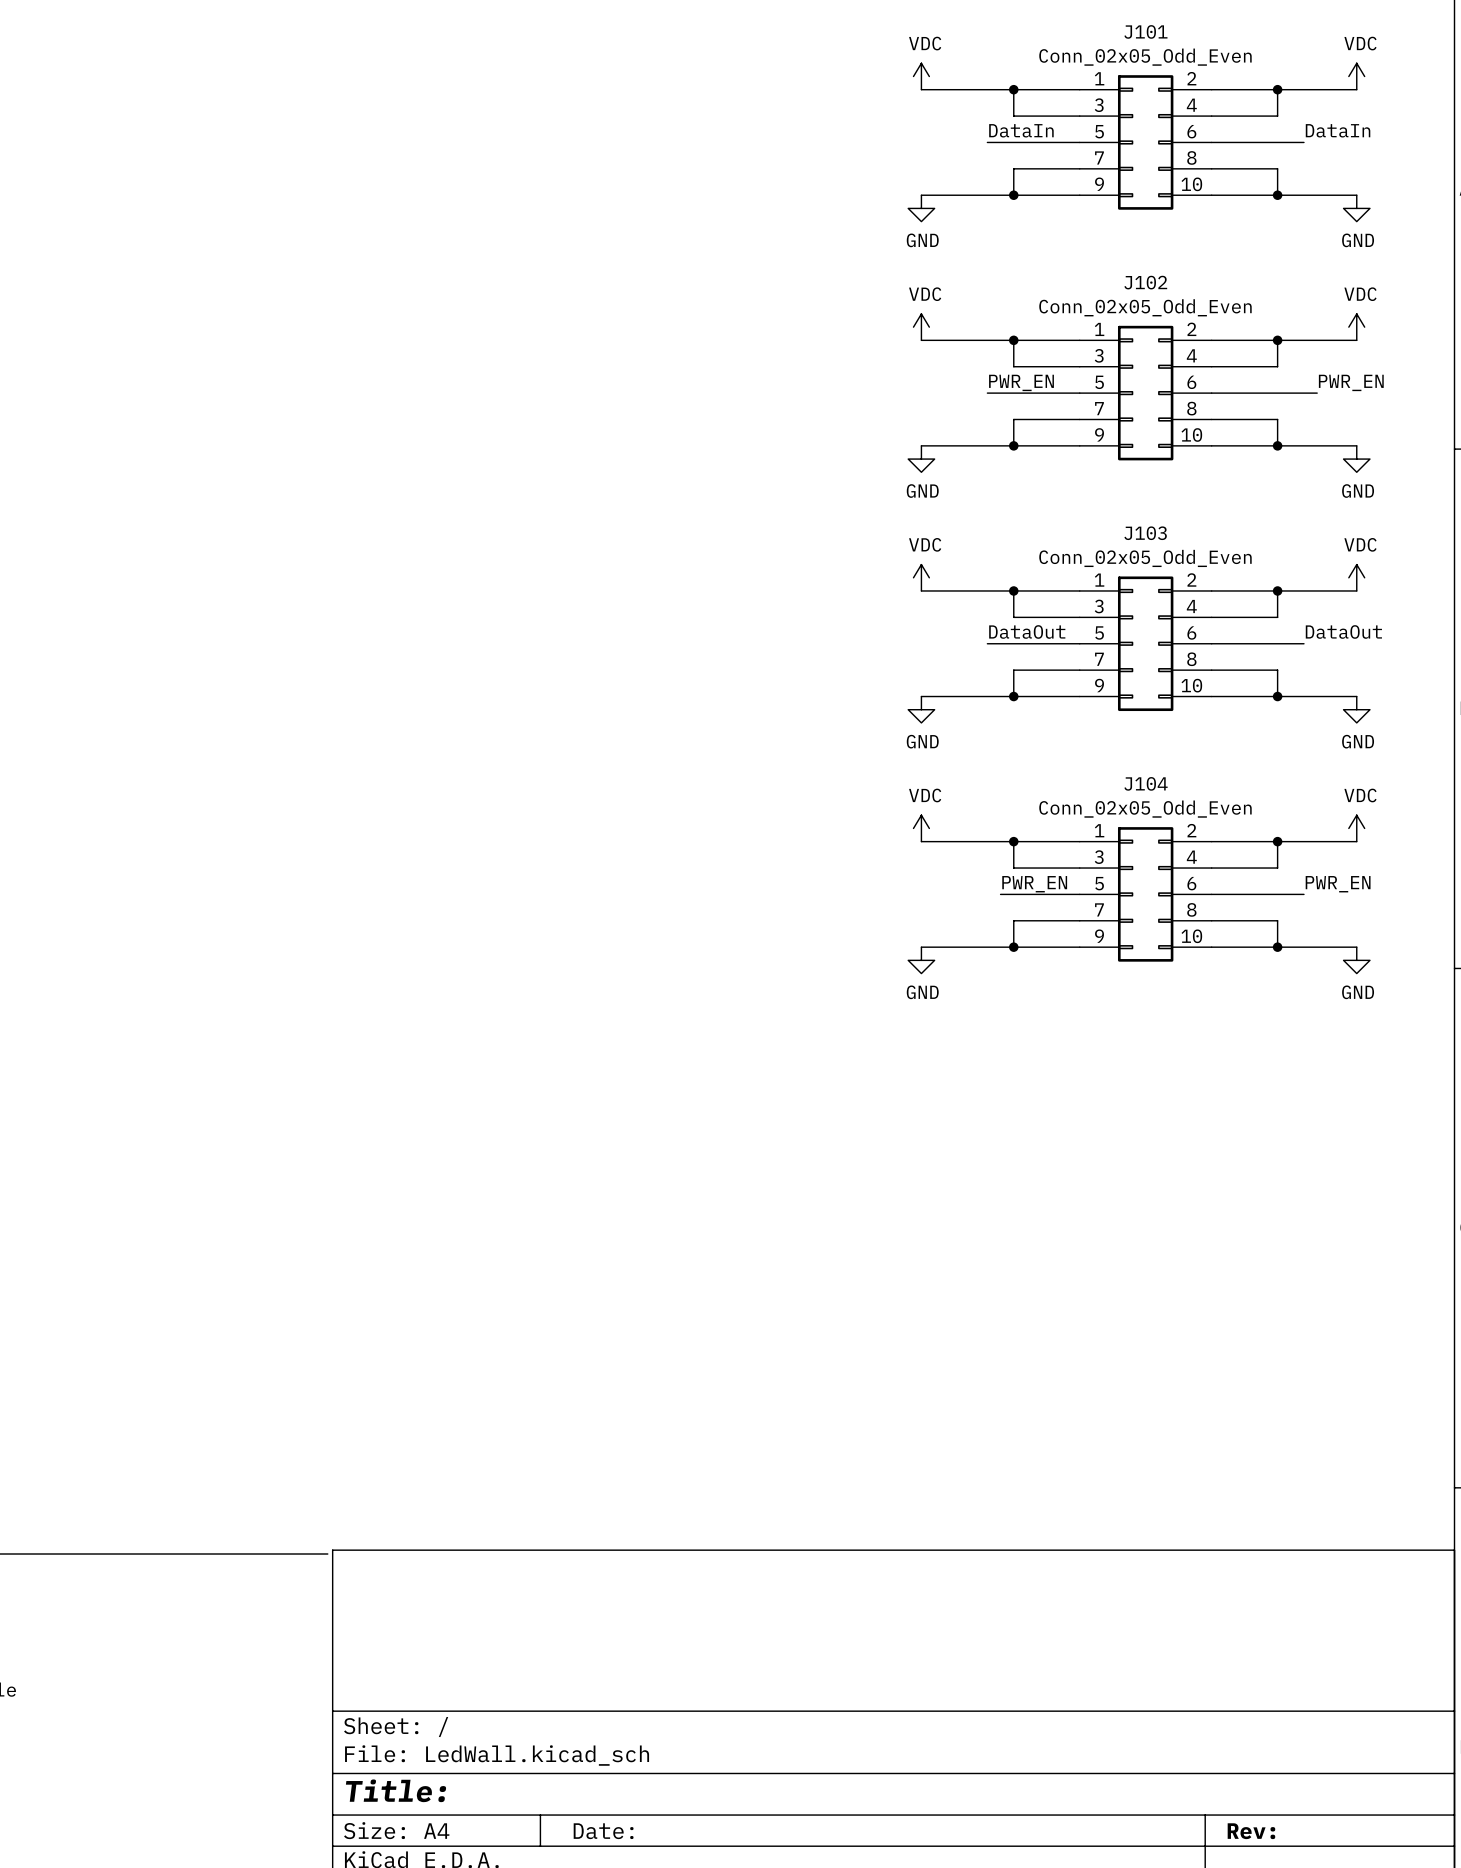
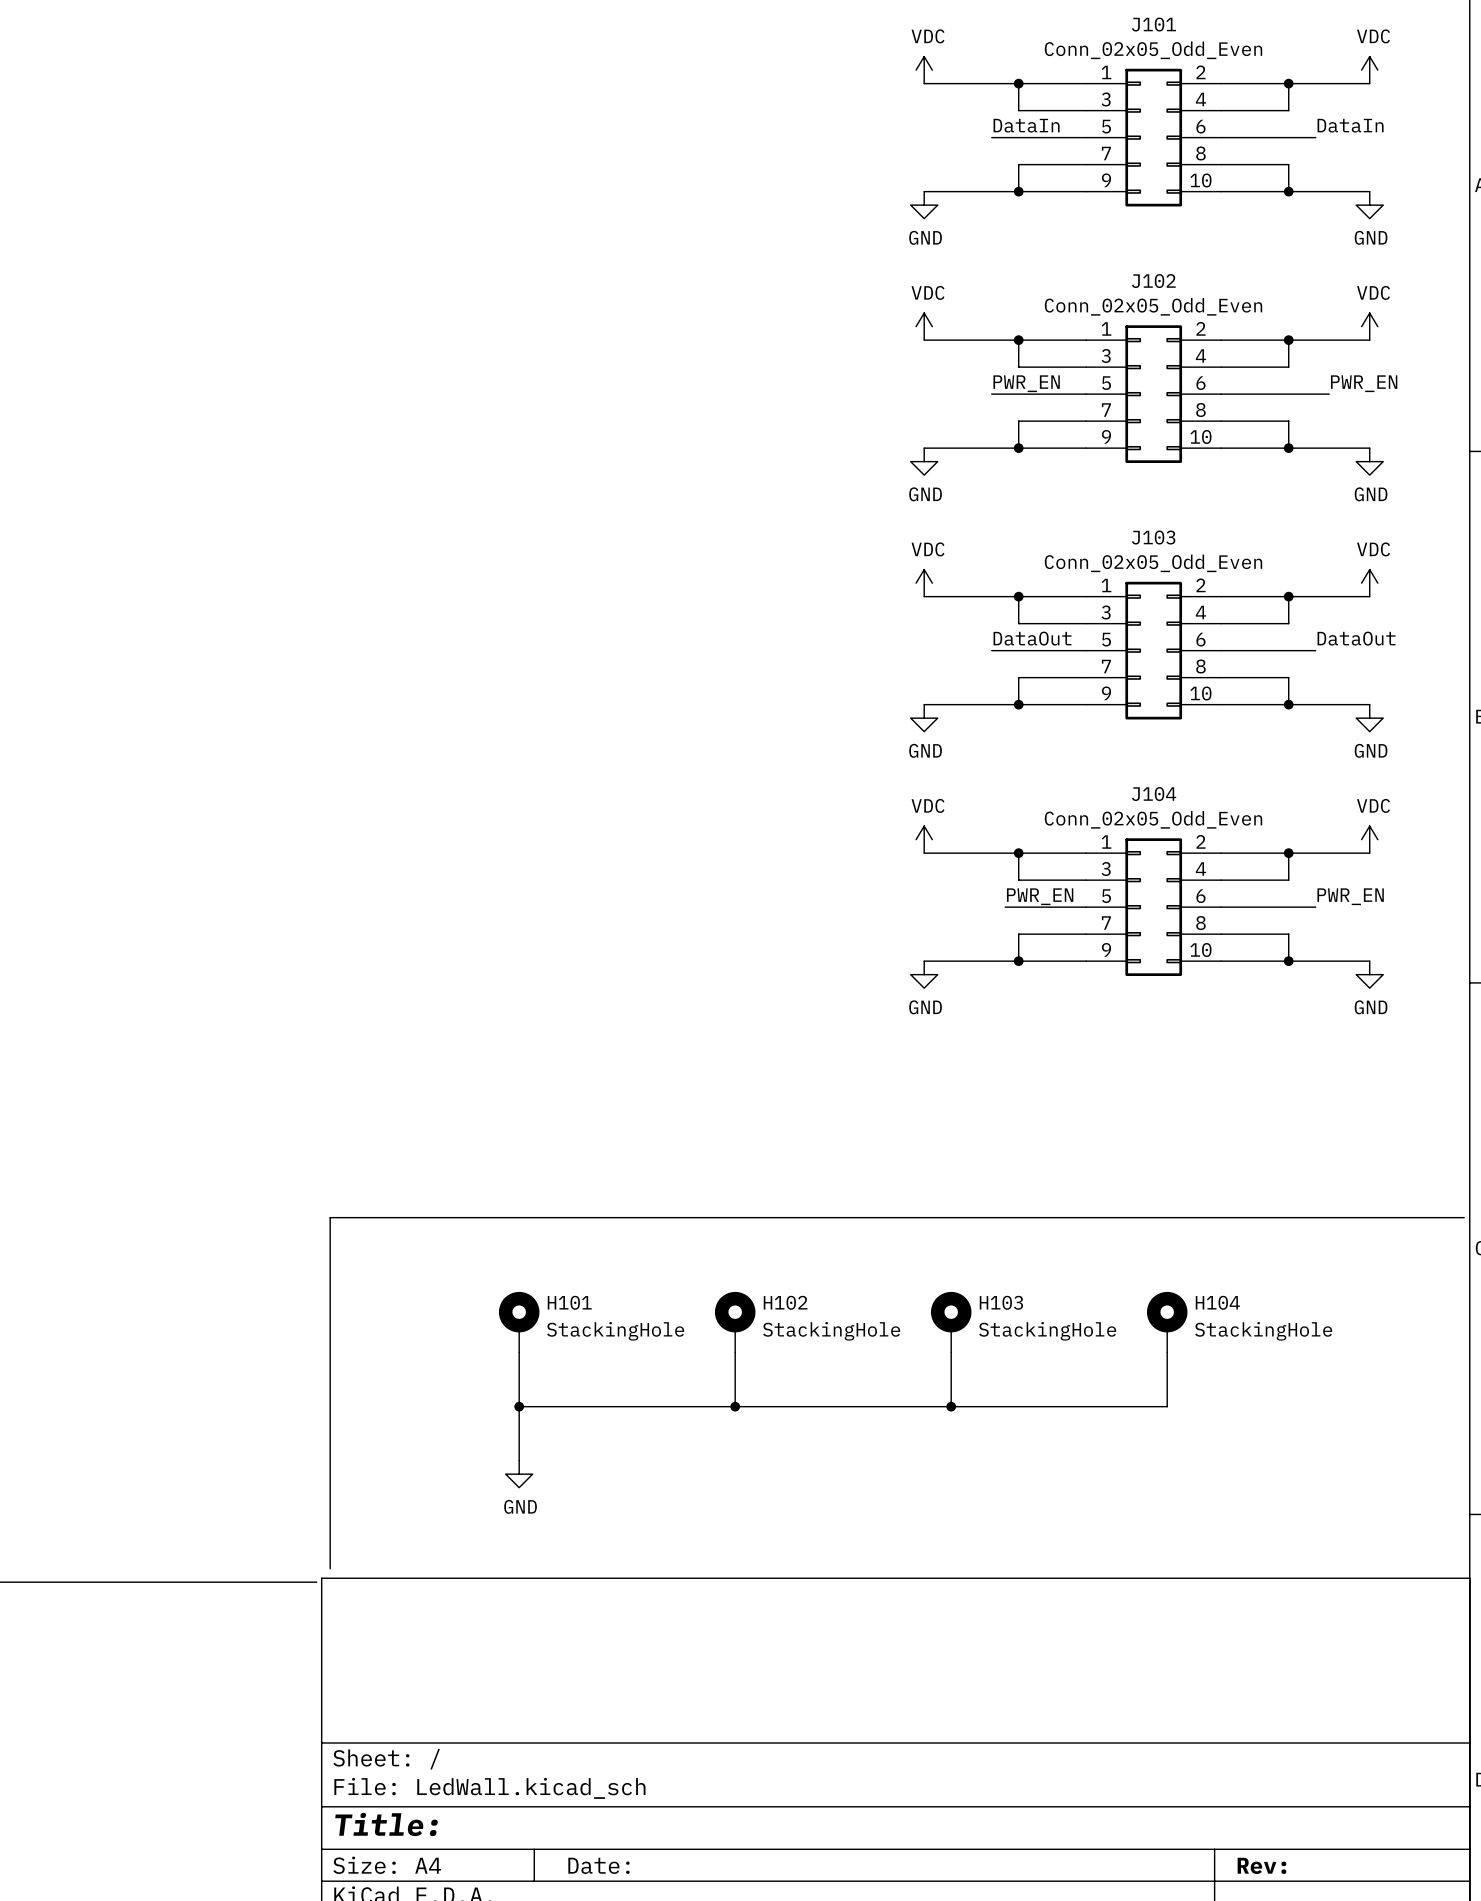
line: none -> (1464, 1217) (330, 1217) (330, 1568)
H101: none -> StackingHole (519, 1322)
H102: none -> StackingHole (735, 1322)
H103: none -> StackingHole (951, 1322)
H104: none -> StackingHole (1167, 1322)
wire: none -> (519, 1352) (519, 1460)
wire: none -> (735, 1352) (735, 1406)
wire: none -> (951, 1352) (951, 1406)
wire: none -> (1167, 1352) (1167, 1406) (519, 1406)
junction: none -> (519, 1406)
junction: none -> (735, 1406)
junction: none -> (951, 1406)
power symbol: none -> GND (519, 1474)

